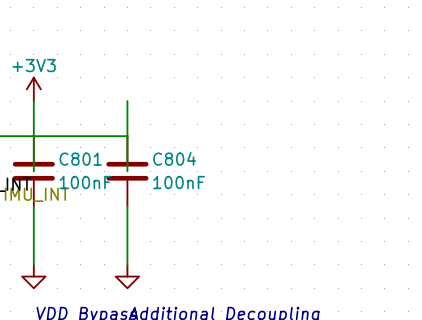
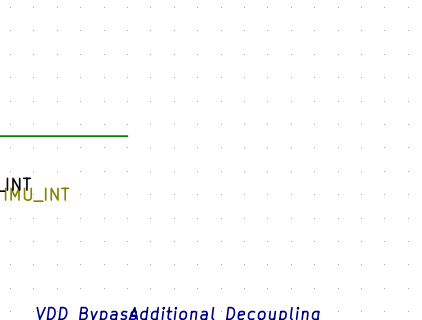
power symbol: +3V3 (33, 89) -> none
wire: (33, 101) (33, 171) -> none
wire: (127, 101) (127, 171) -> none
C801: 100nF (33, 171) -> none
C804: 100nF (127, 171) -> none
wire: (33, 206) (33, 264) -> none
wire: (127, 206) (127, 264) -> none
power symbol: (33, 276) -> none
power symbol: (127, 276) -> none

